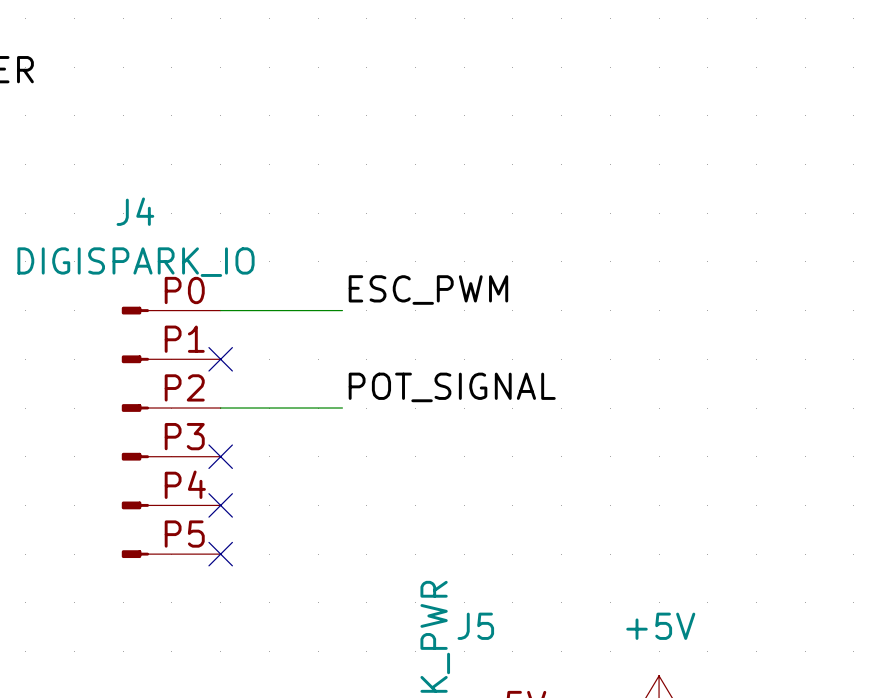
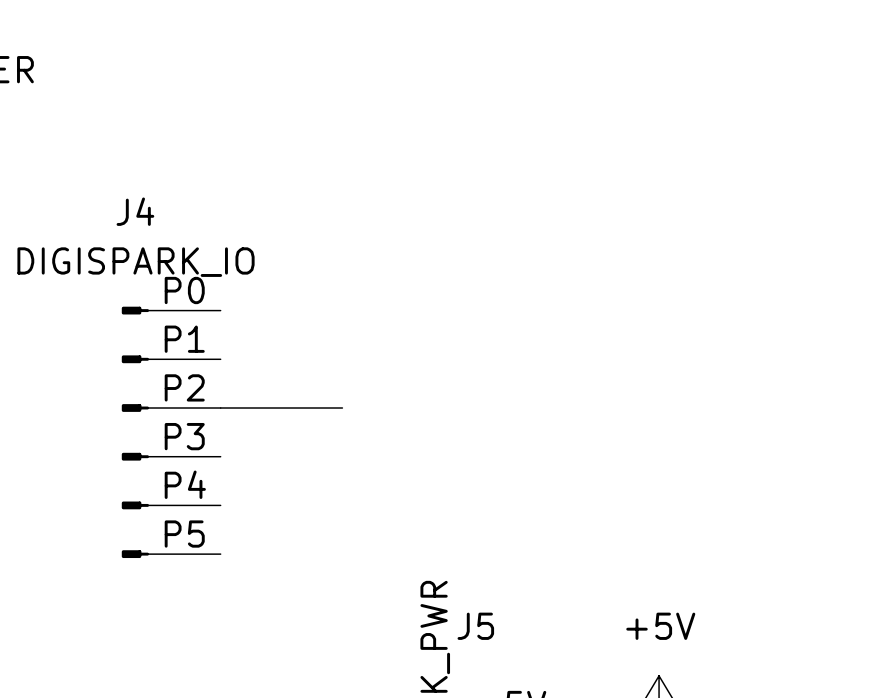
label: ESC_PWM (428, 290) -> none
wire: (220, 310) (342, 310) -> none
no-connect mark: (220, 359) -> none
label: POT_SIGNAL (452, 387) -> none
no-connect mark: (220, 456) -> none
no-connect mark: (220, 505) -> none
no-connect mark: (220, 554) -> none

